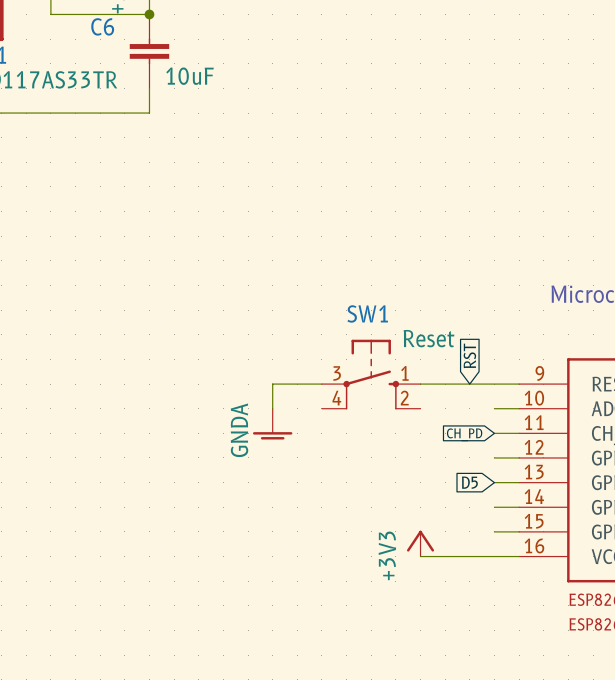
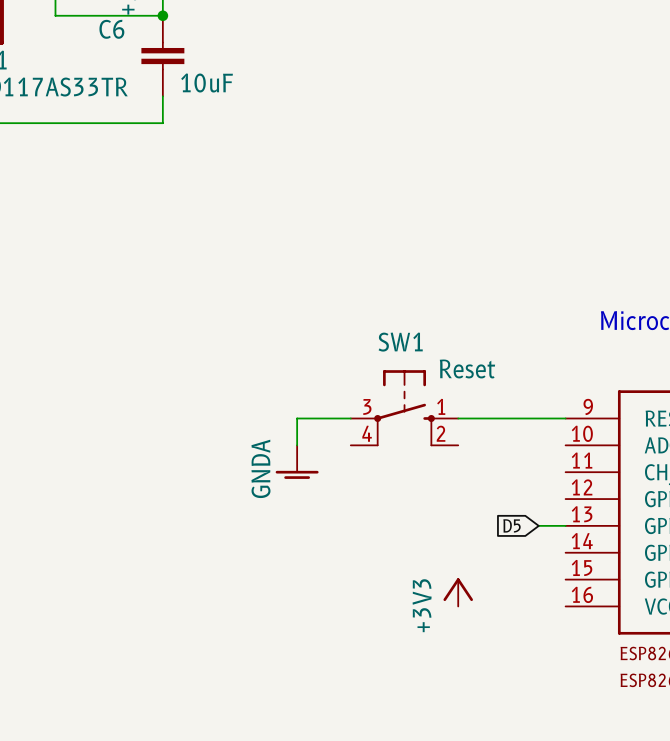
global label: RST (469, 355) -> none
wire: (494, 408) (519, 408) -> none
wire: (494, 433) (519, 433) -> none
global label: CH_PD (464, 434) -> none
wire: (494, 457) (519, 457) -> none
wire: (494, 507) (519, 507) -> none
wire: (494, 531) (519, 531) -> none
wire: (420, 556) (519, 556) -> none

